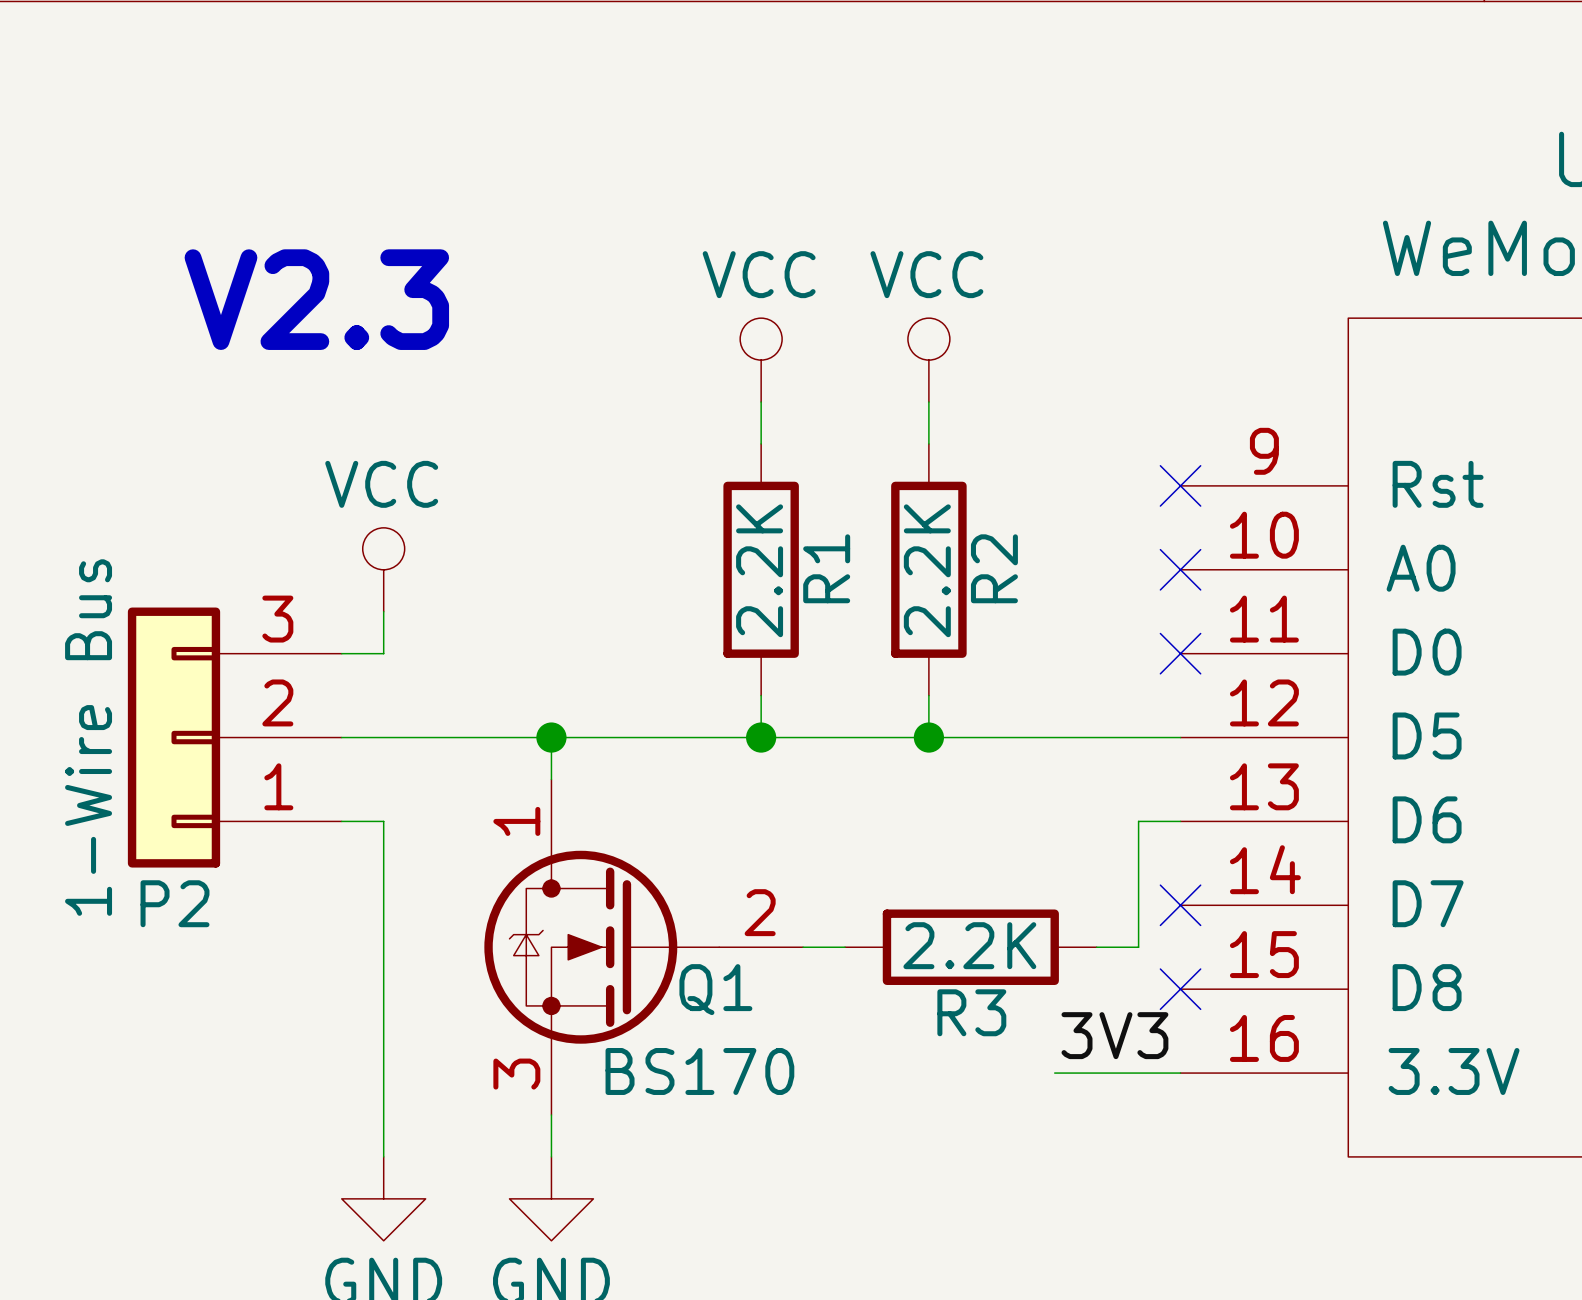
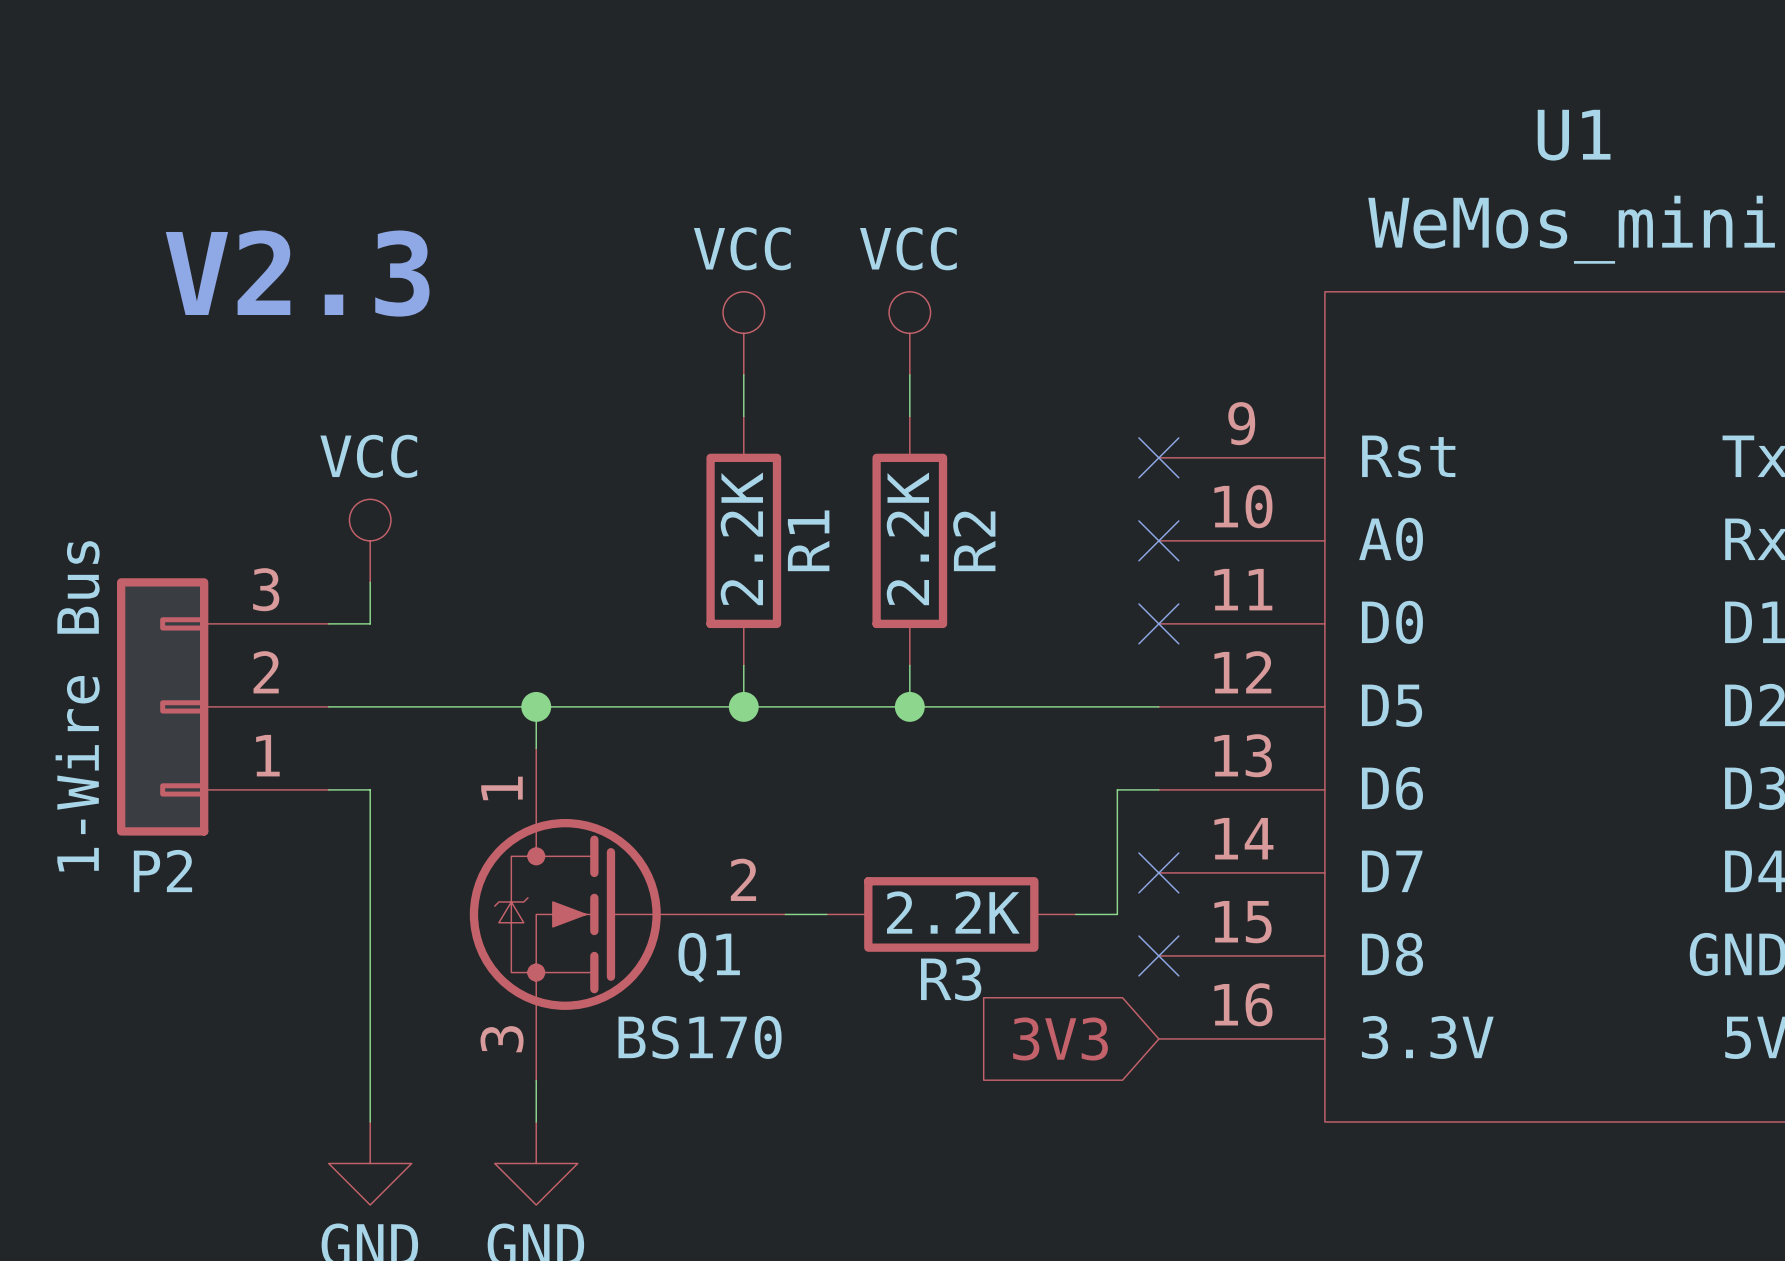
label: 3V3 (1114, 1035) -> none
wire: (1054, 1073) (1180, 1073) -> none
global label: none -> 3V3 (1060, 1039)

